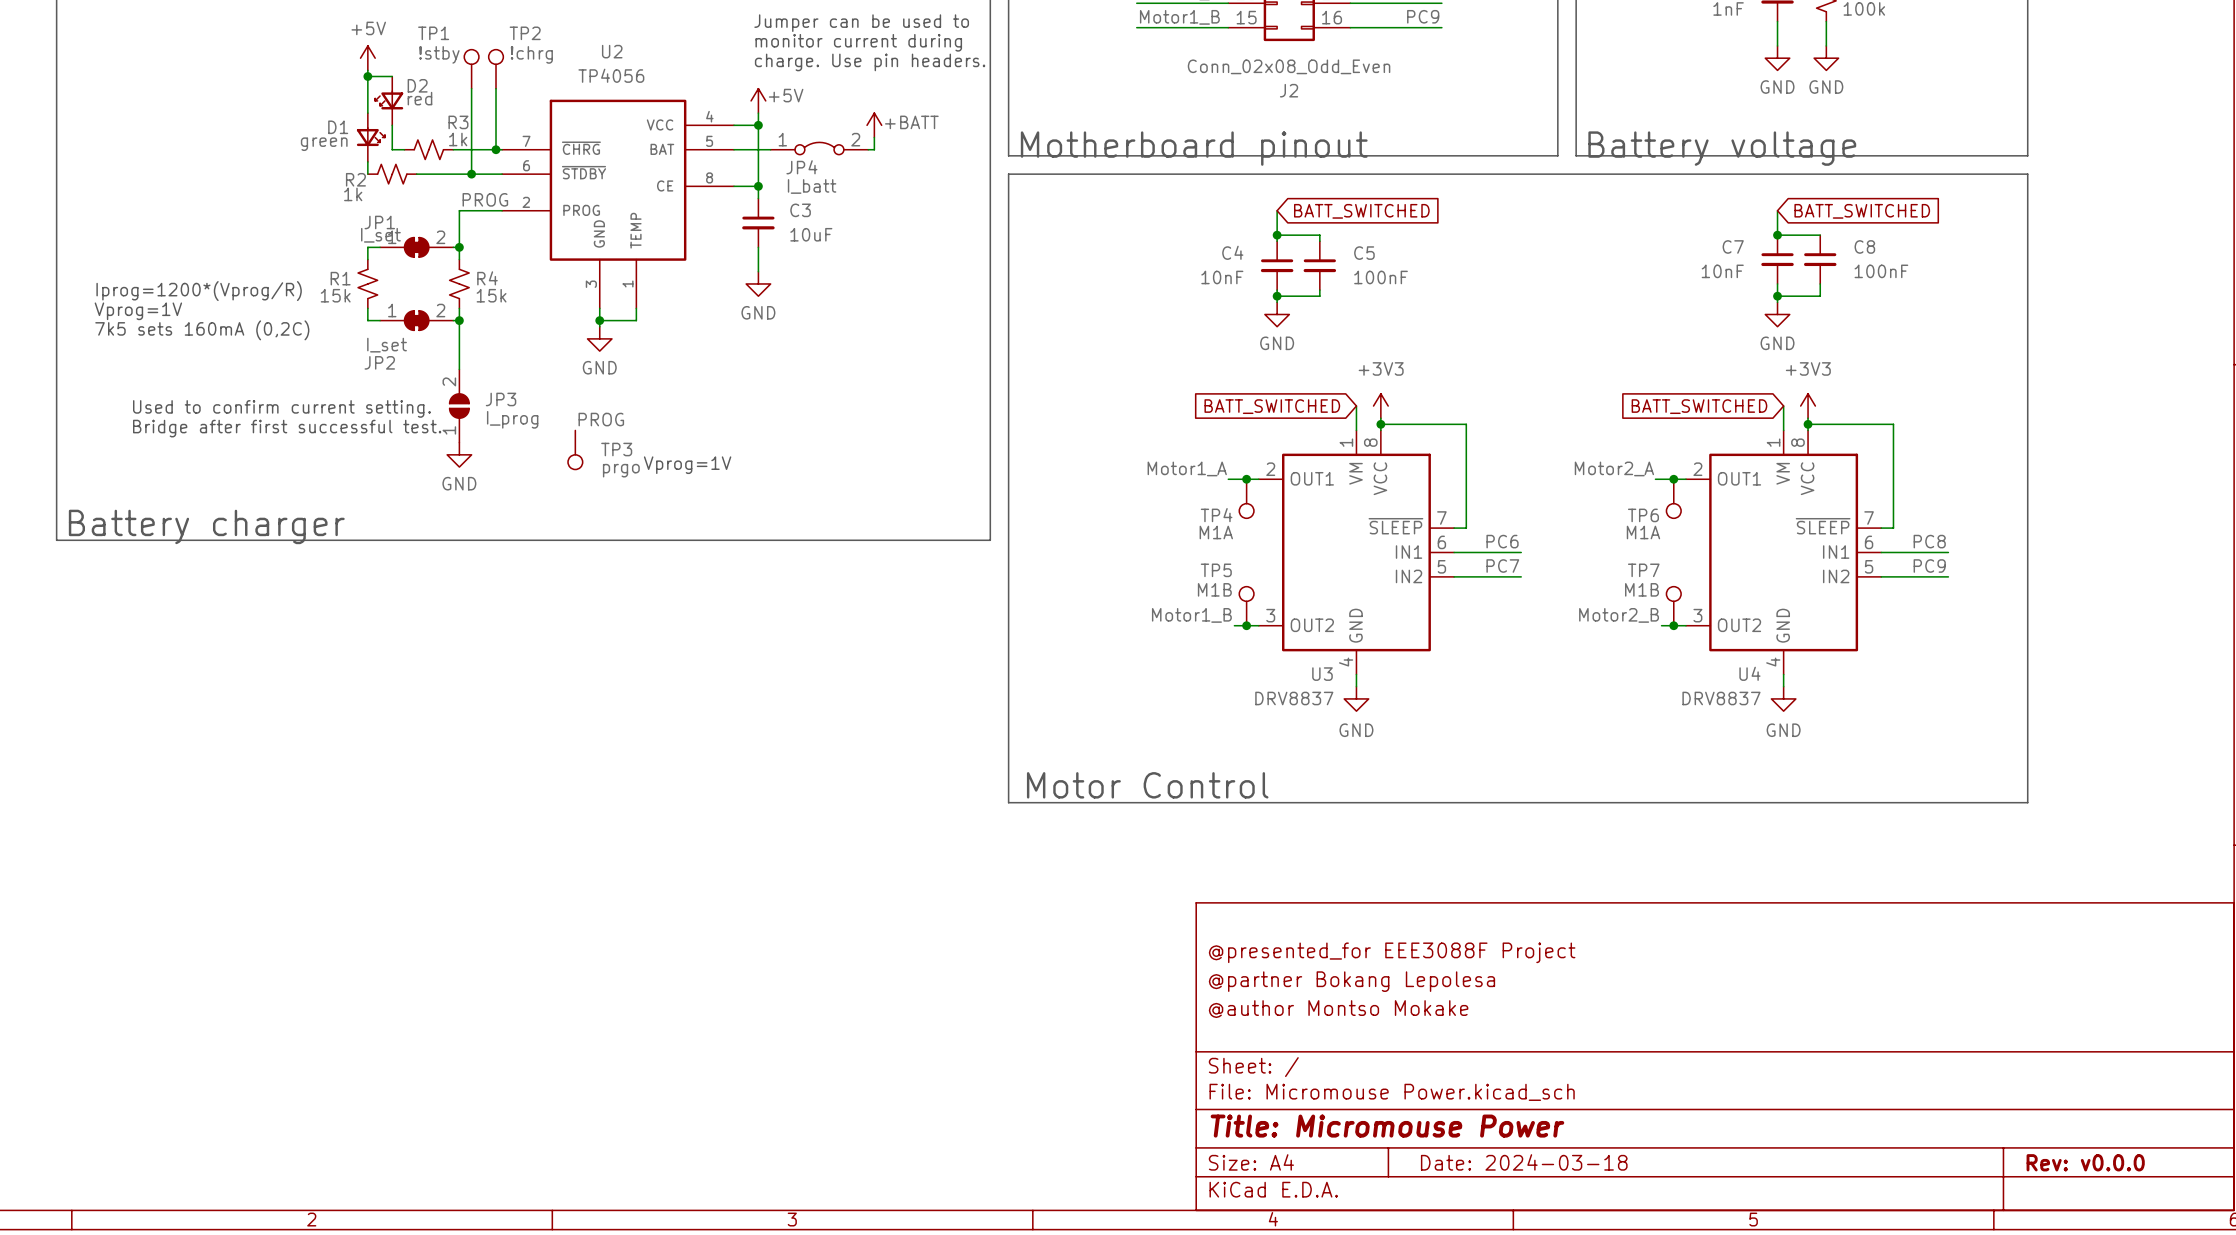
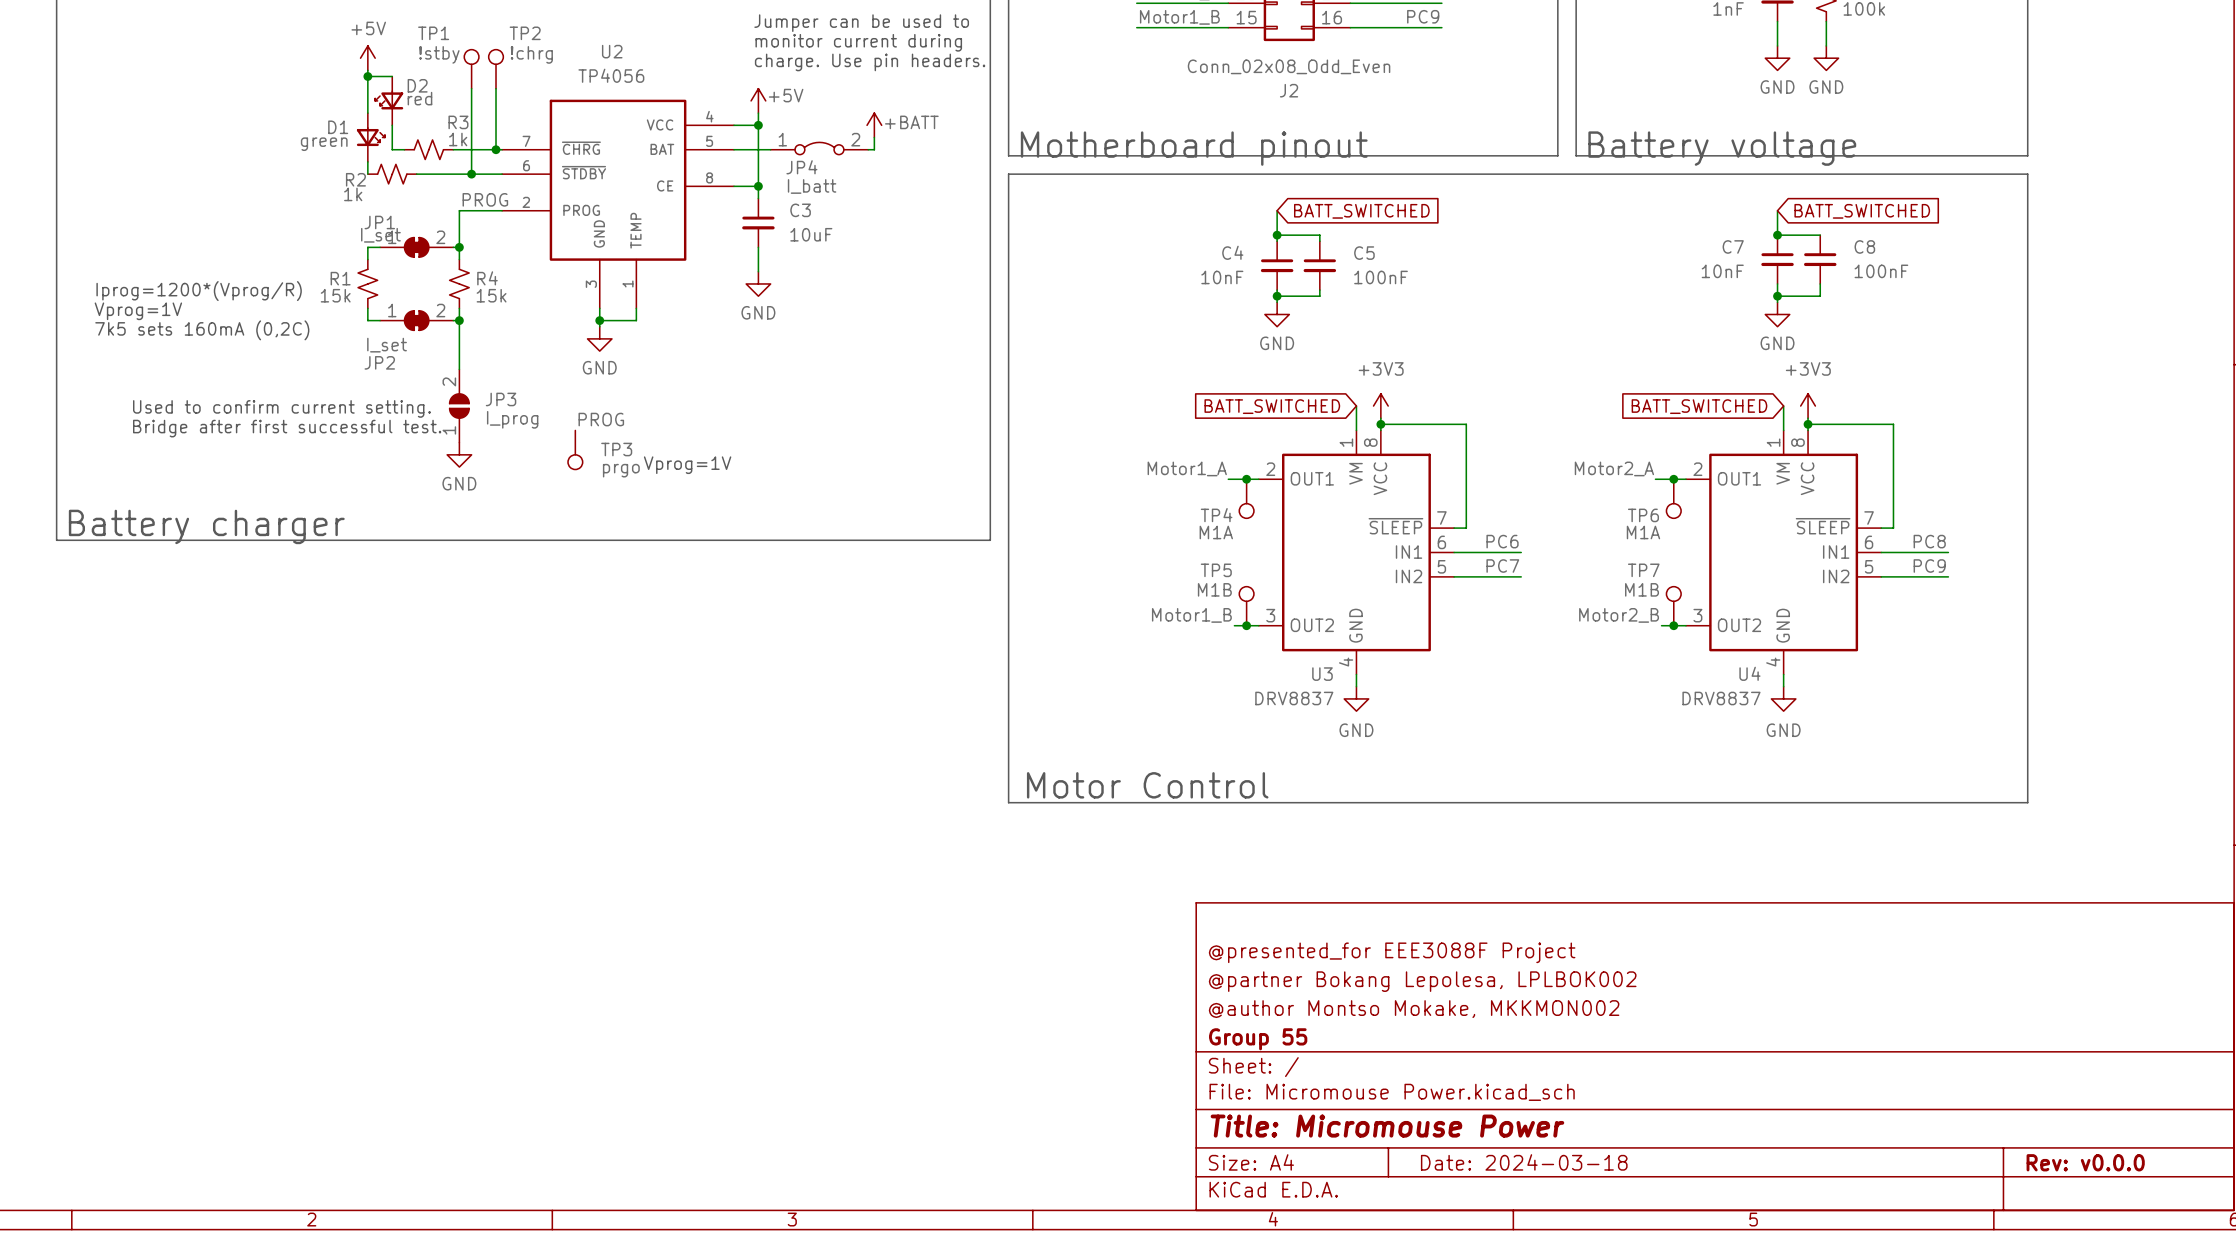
title block: @partner Bokang Lepolesa (1351, 981) -> @partner Bokang Lepolesa, LPLBOK002 (1422, 981)
title block: @author Montso Mokake (1338, 1009) -> @author Montso Mokake, MKKMON002 (1414, 1009)
title block: none -> Group 55 (1258, 1039)

